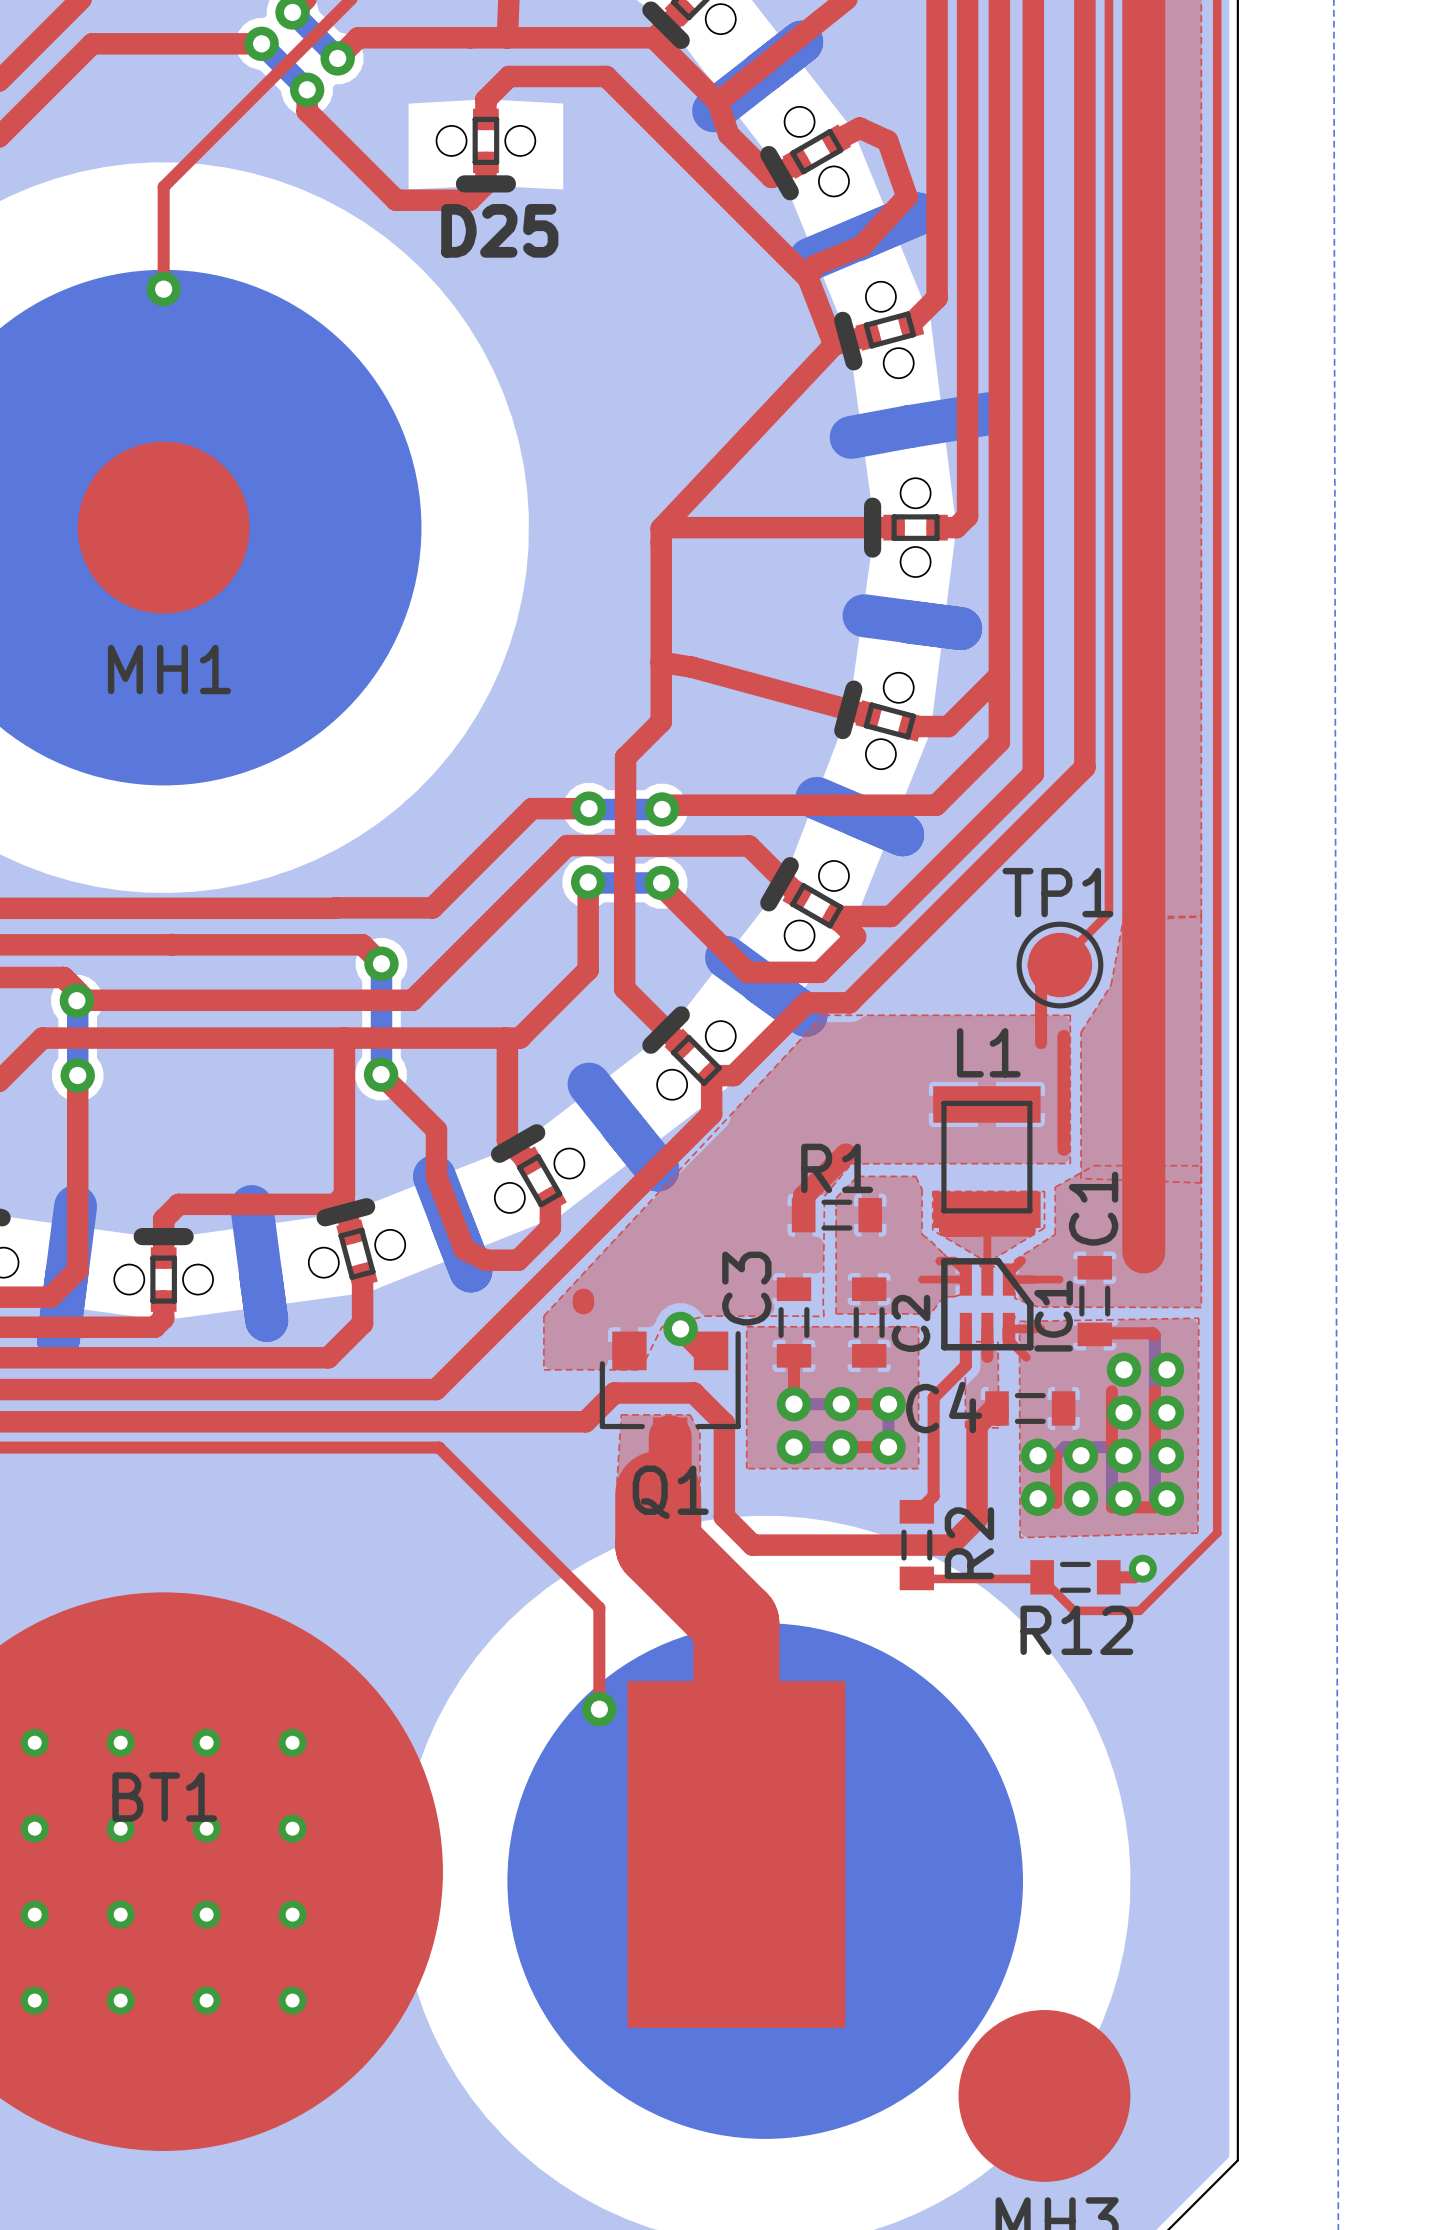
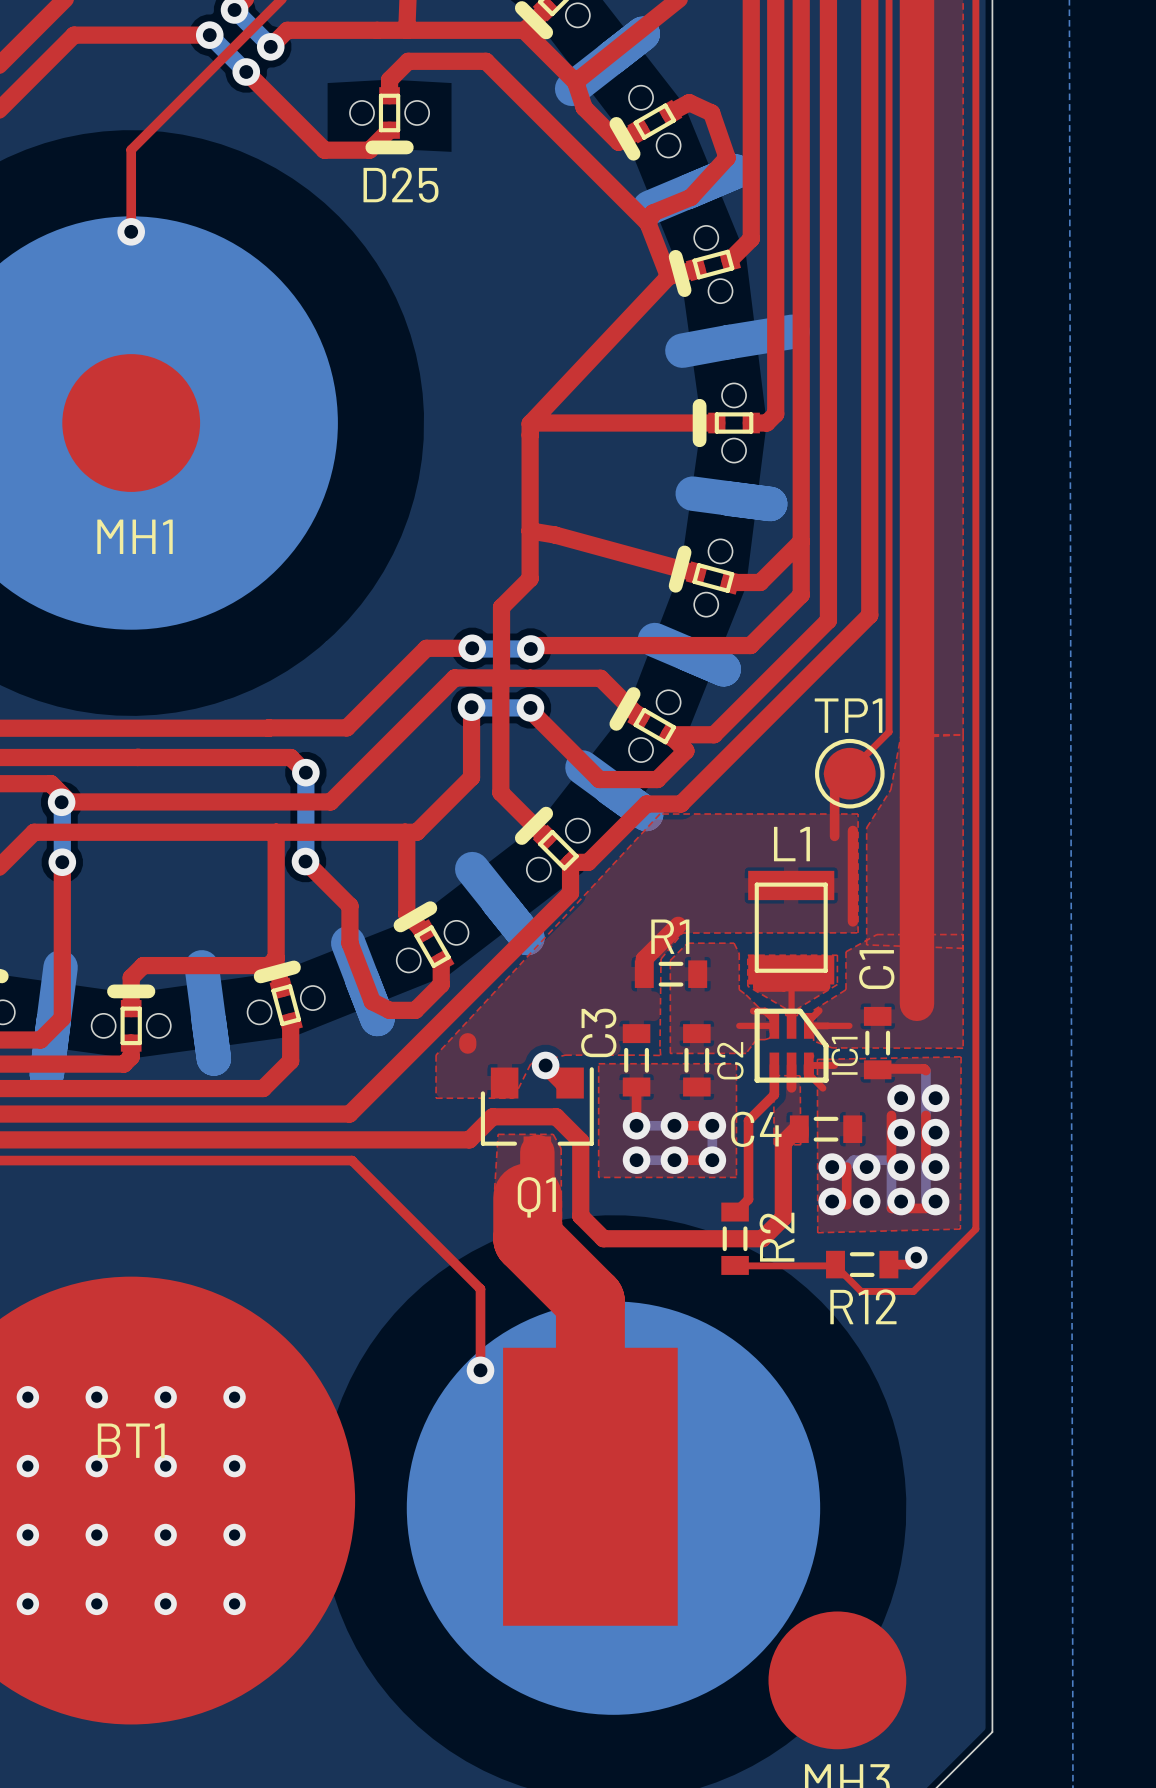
top track: (307, 89) (307, 111) (396, 200) (469, 200) (485, 183) (485, 162) -> (246, 71) (324, 150) (369, 150) (389, 130)

